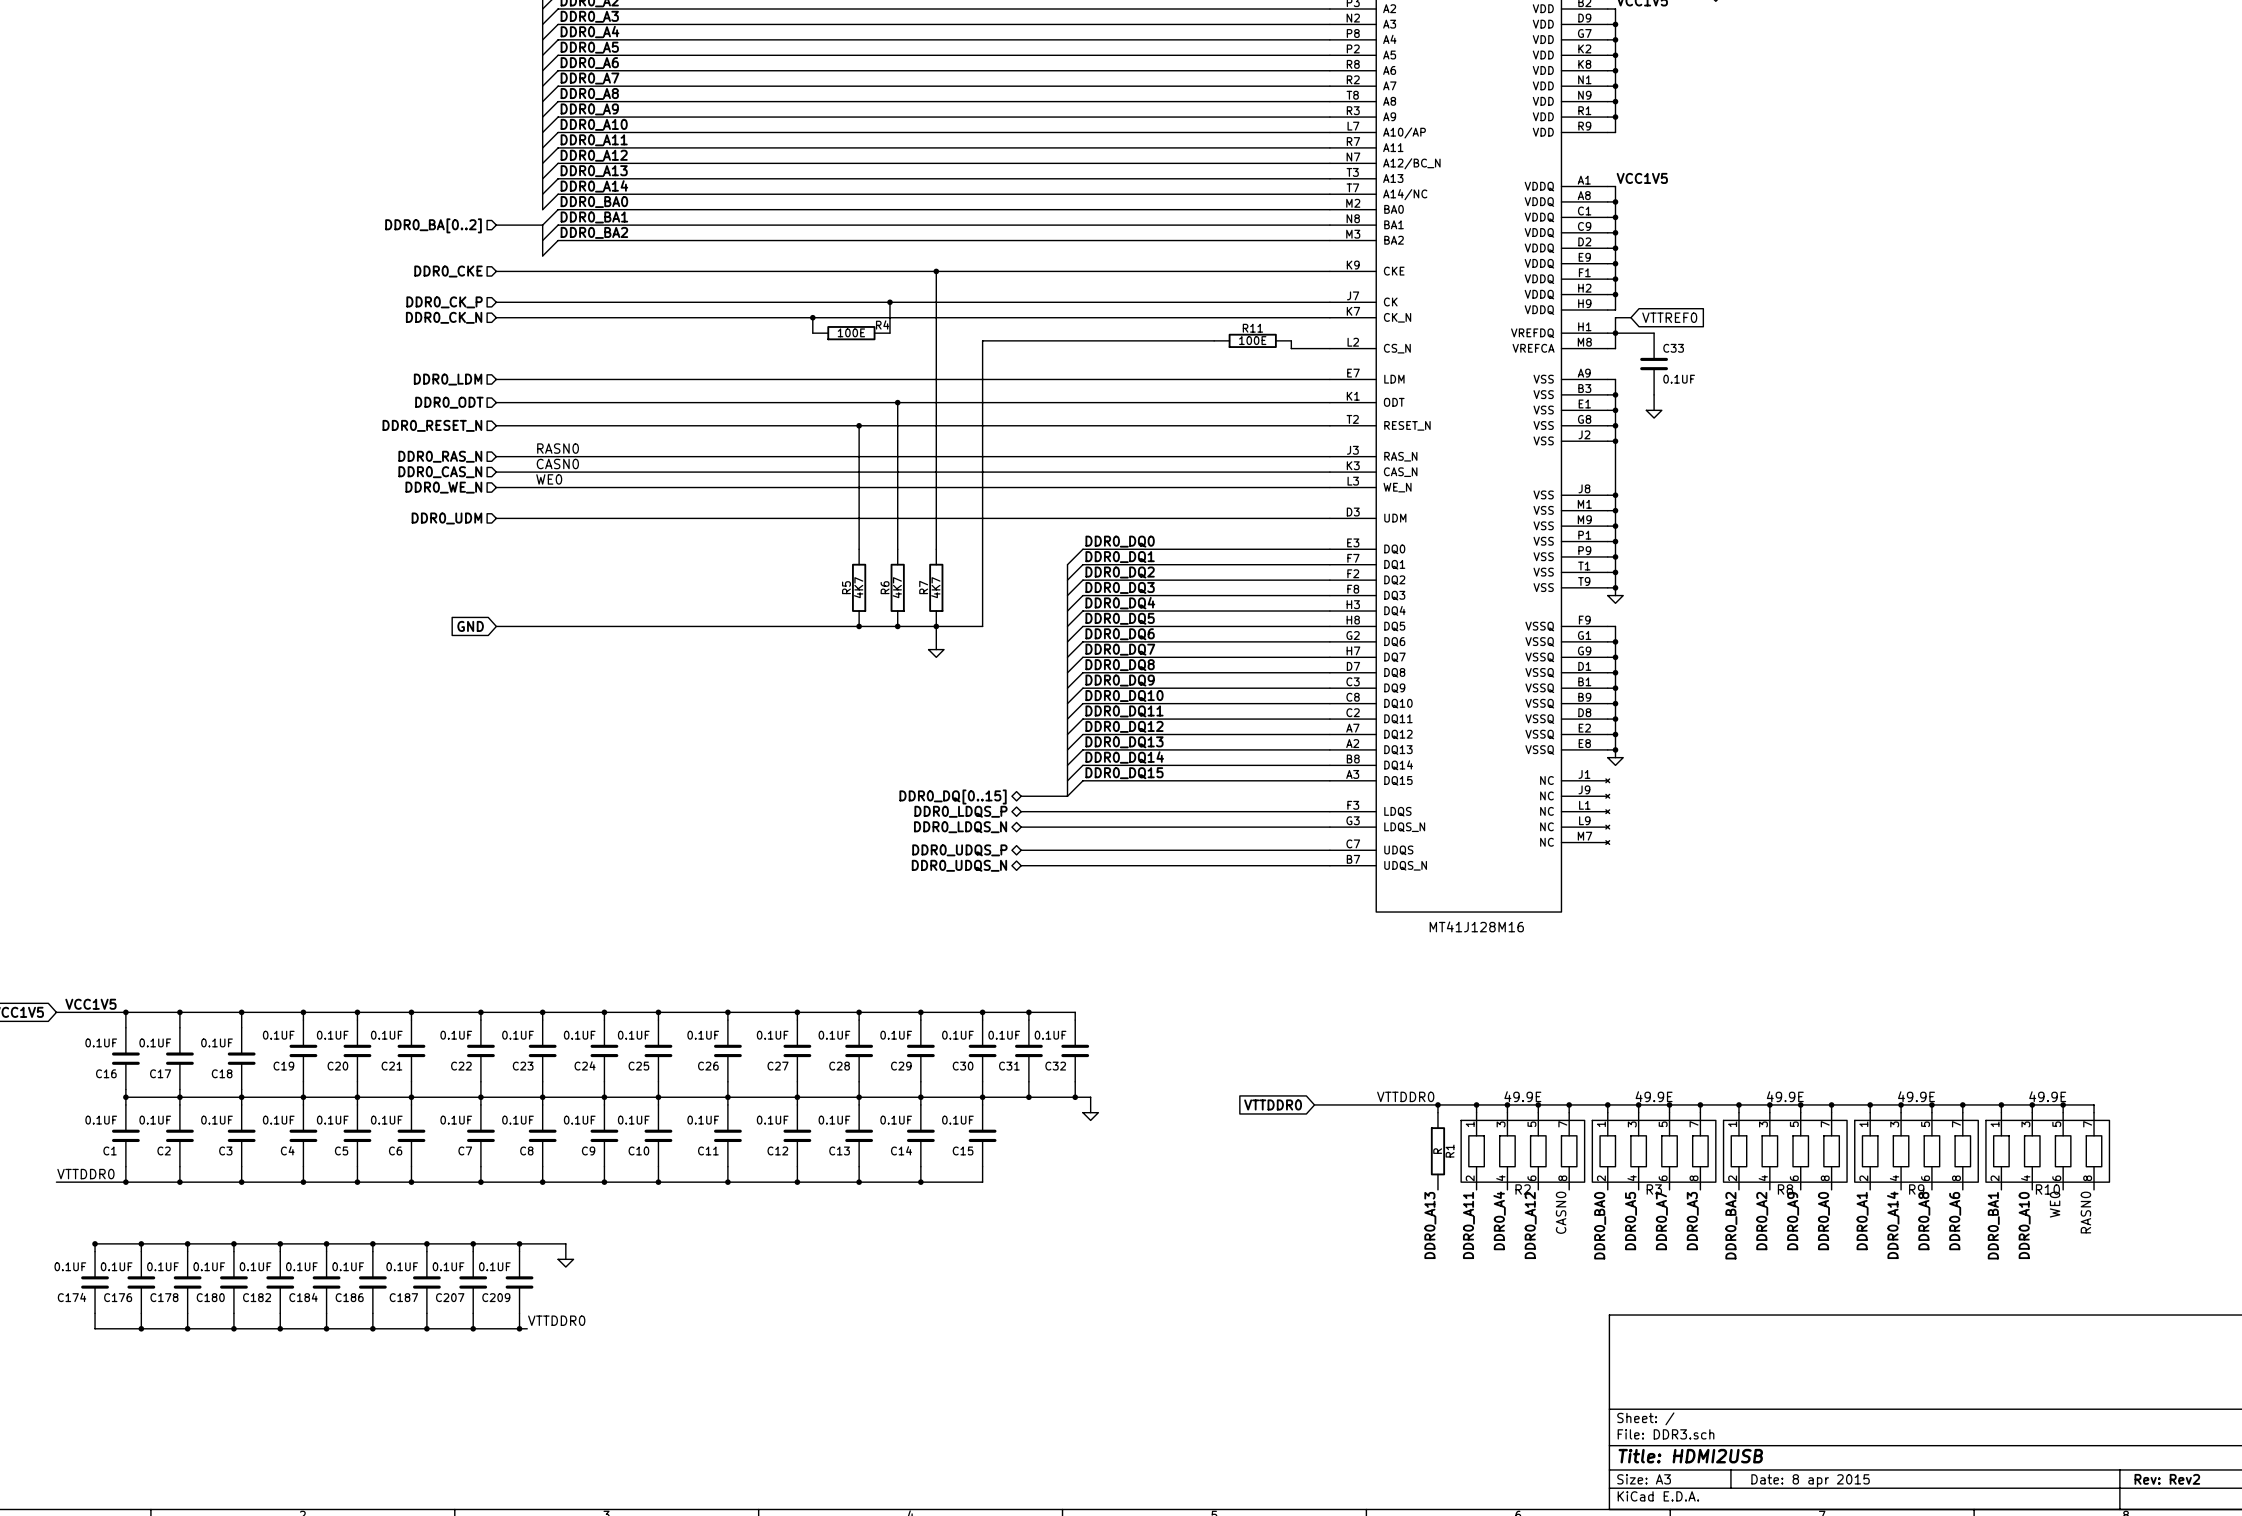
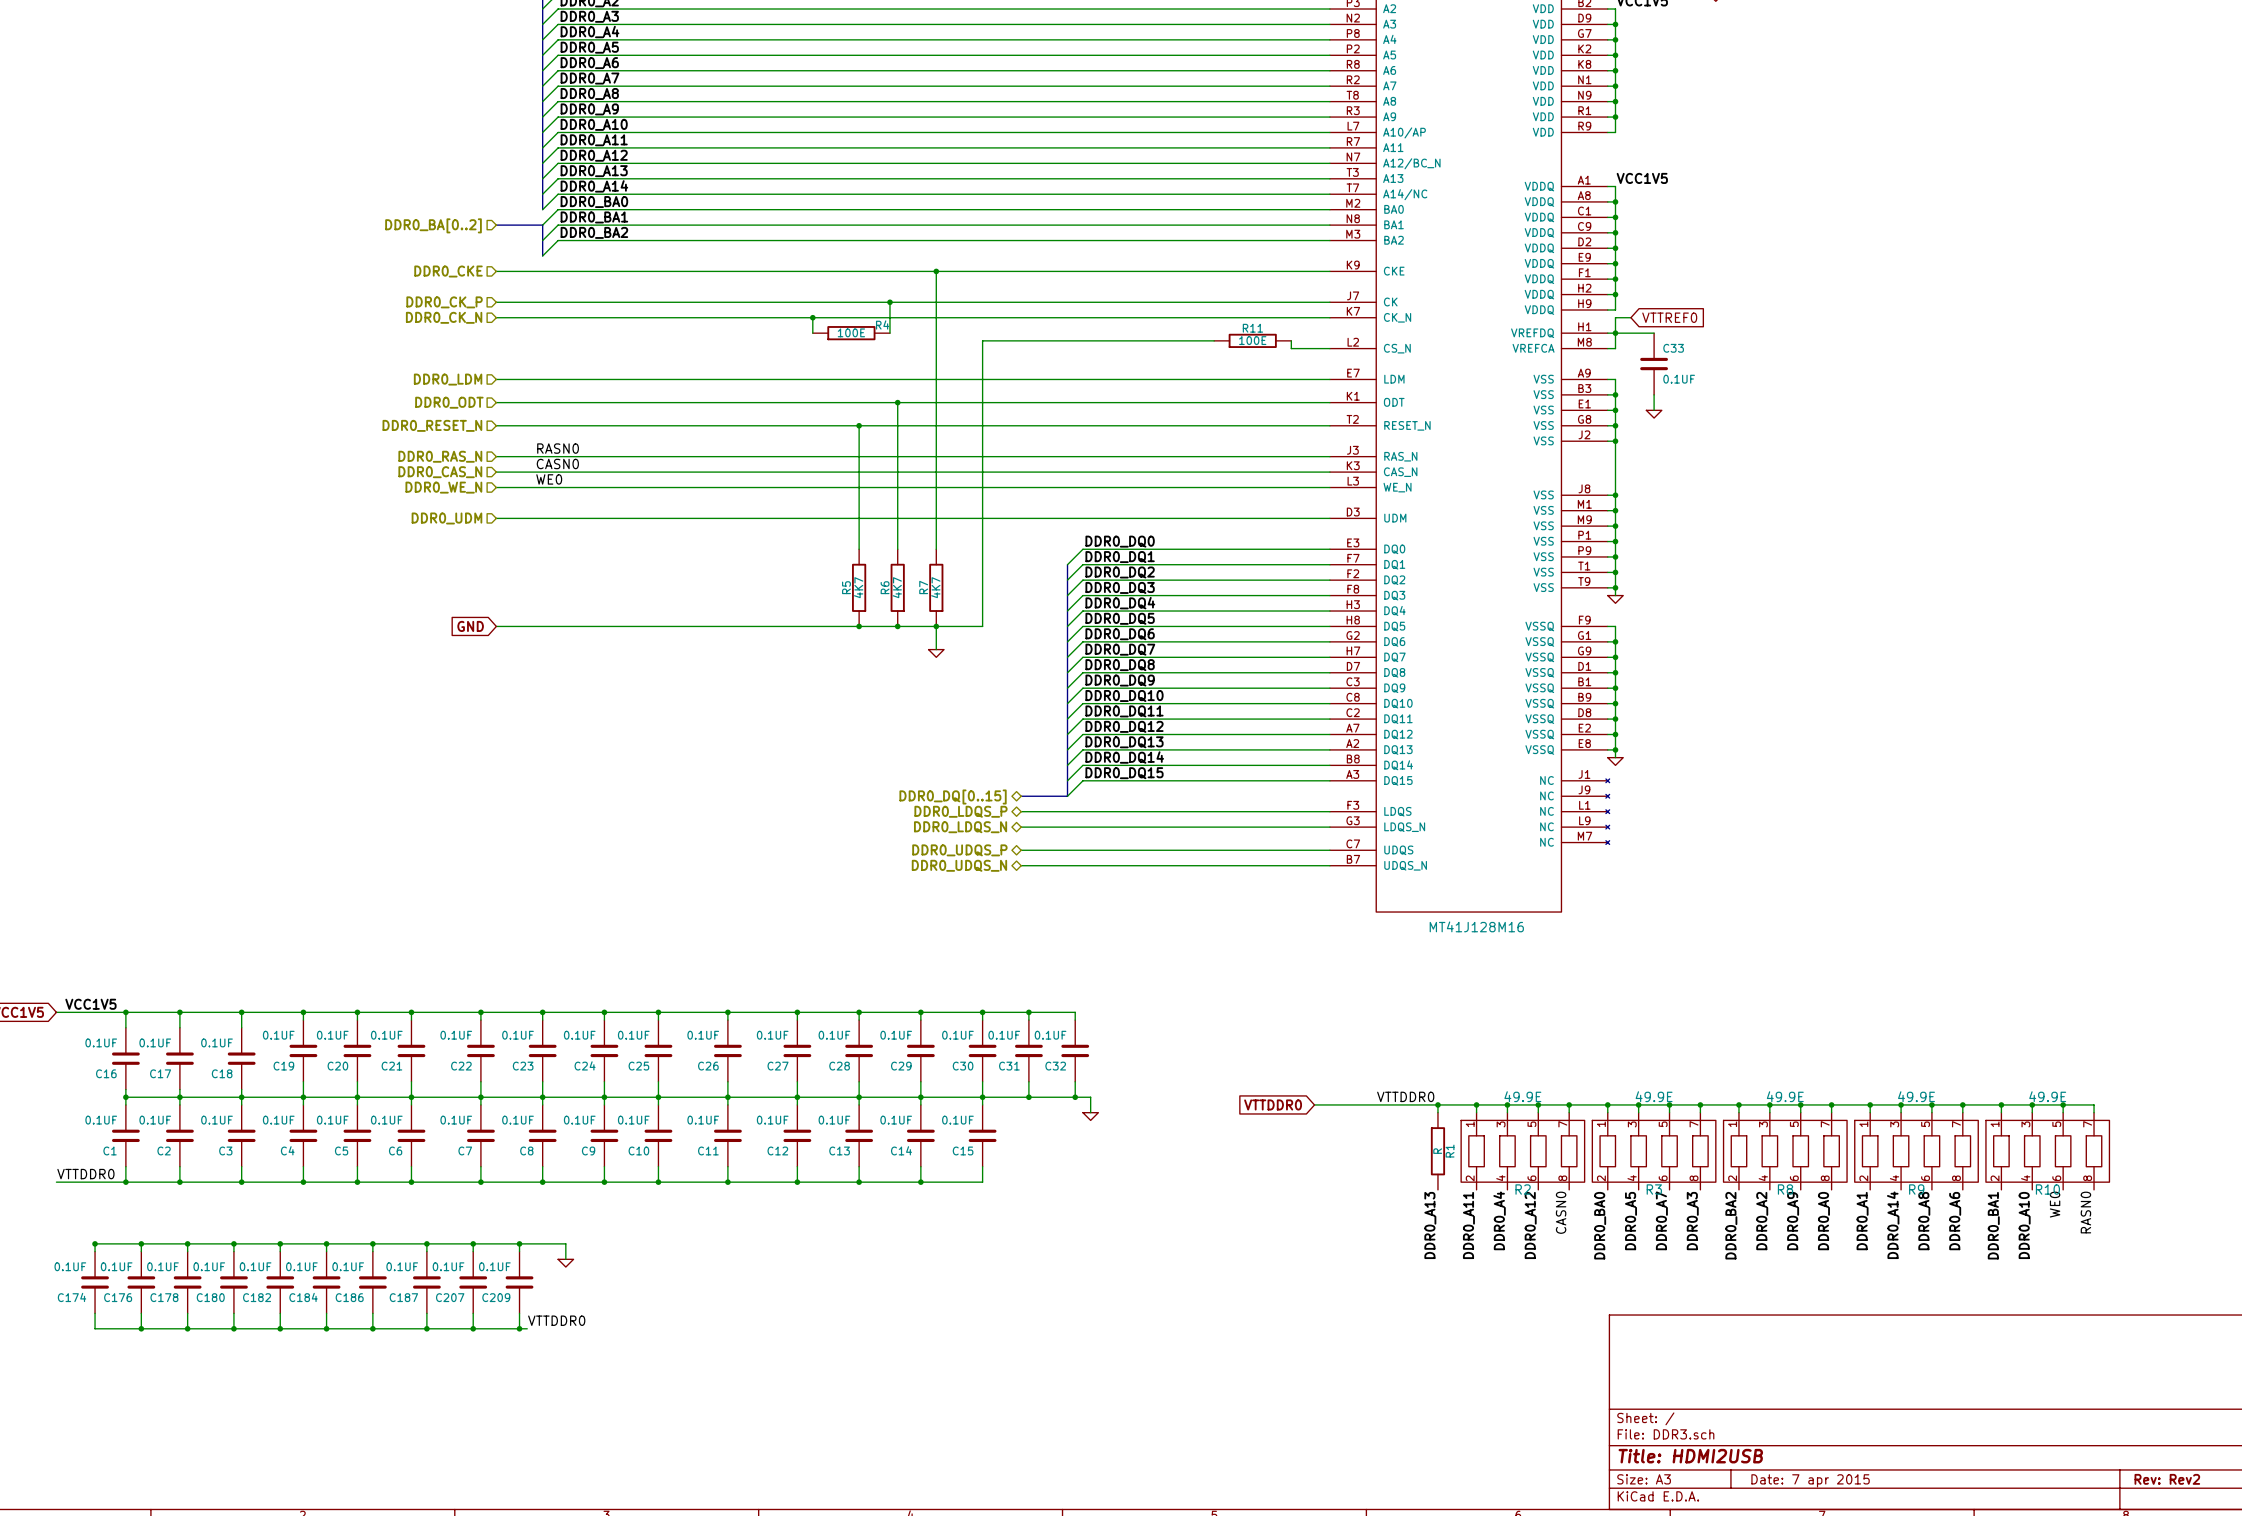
title block: Date: 8 apr 2015 (1810, 1480) -> Date: 7 apr 2015 (1810, 1480)

